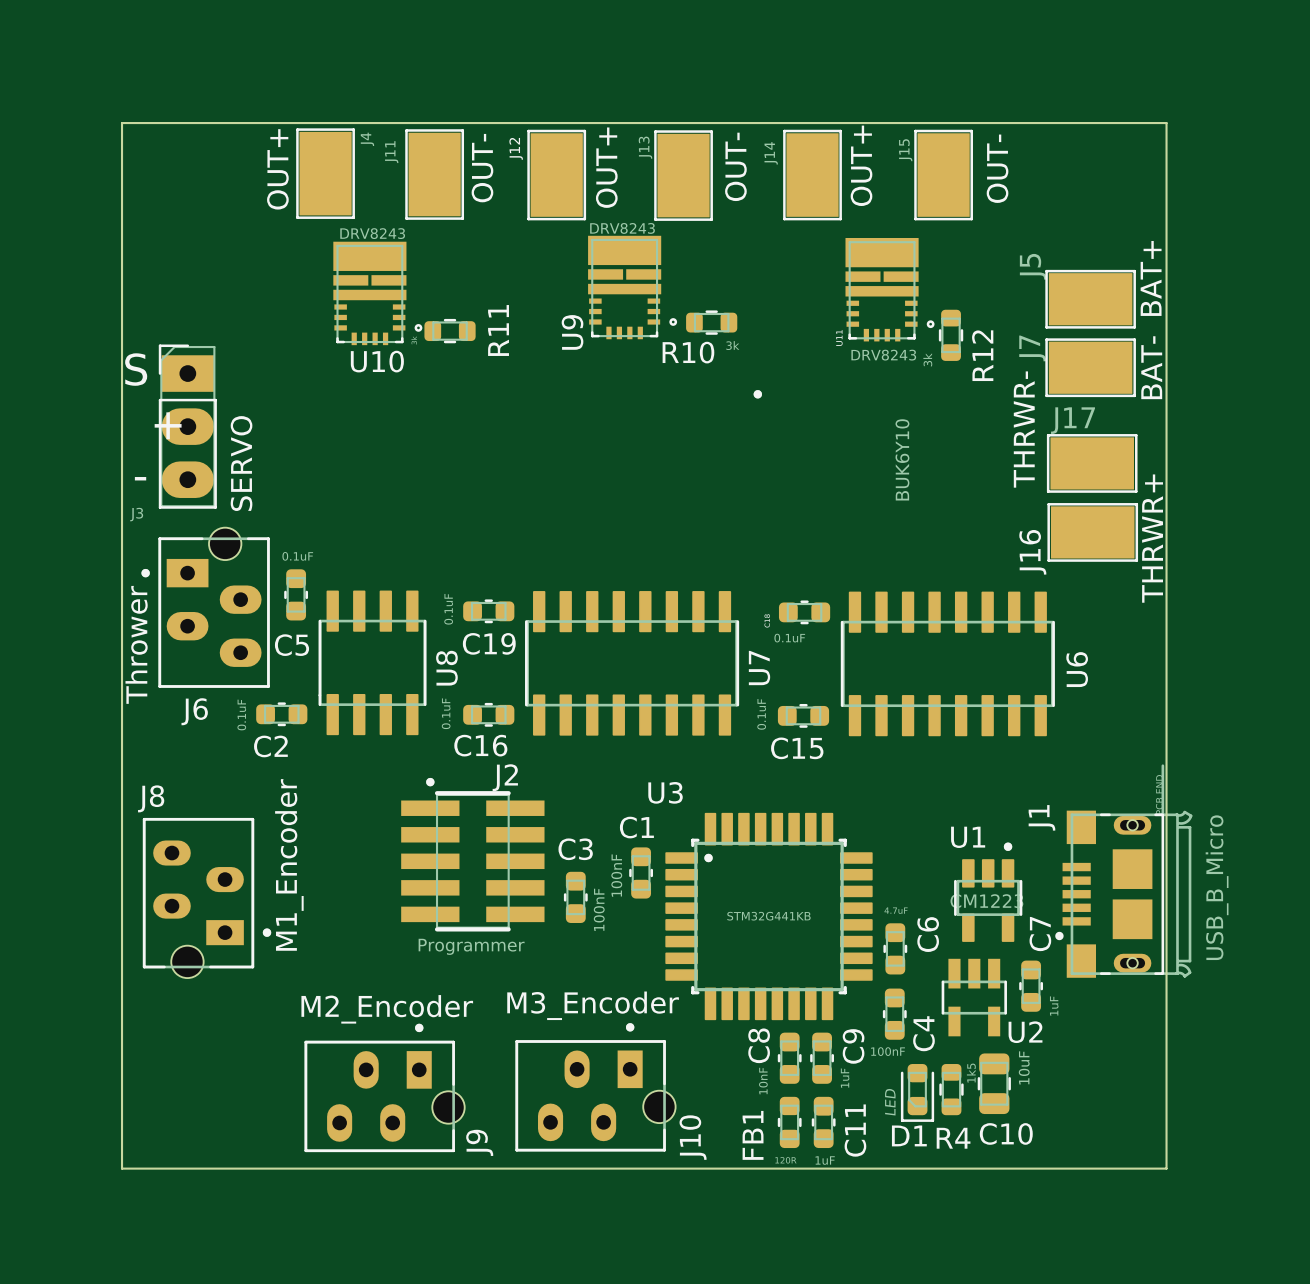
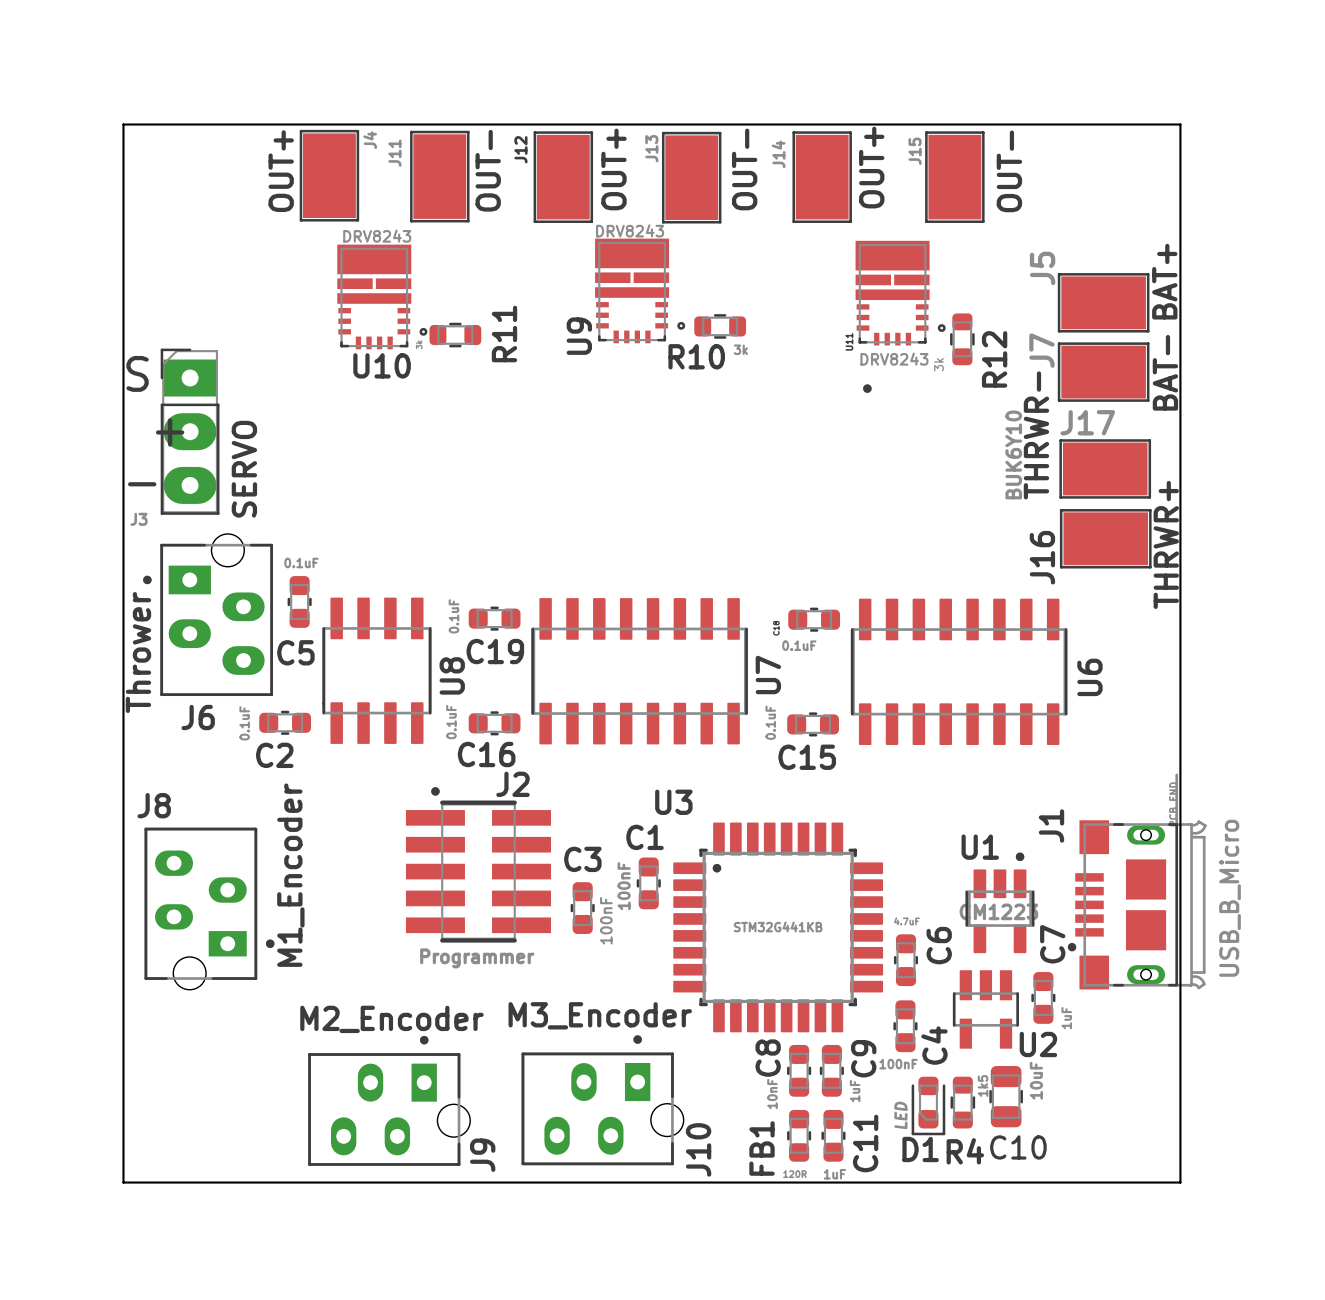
part position: (757, 394) -> (867, 388)

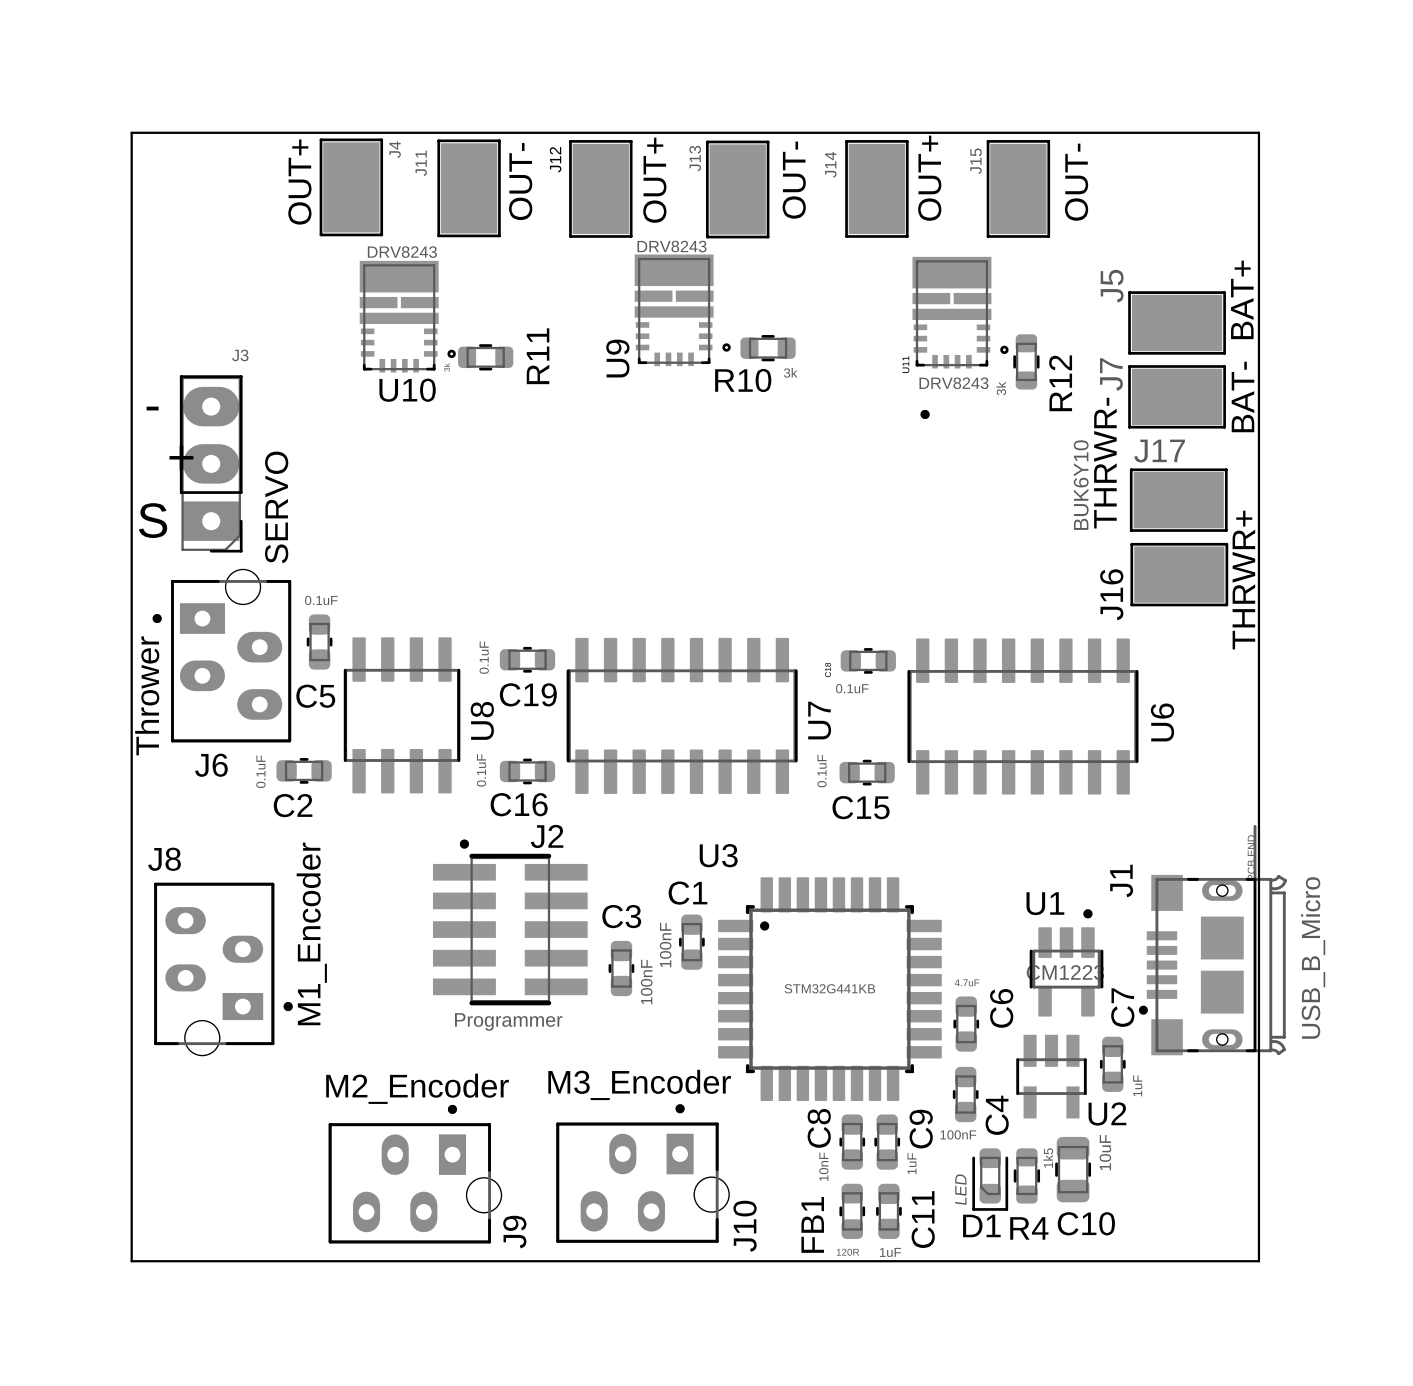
text: S (137, 373) -> - (152, 408)
J3 rotation: 0° (190, 431) -> 180° (211, 463)
text: - (142, 484) -> S (153, 520)

